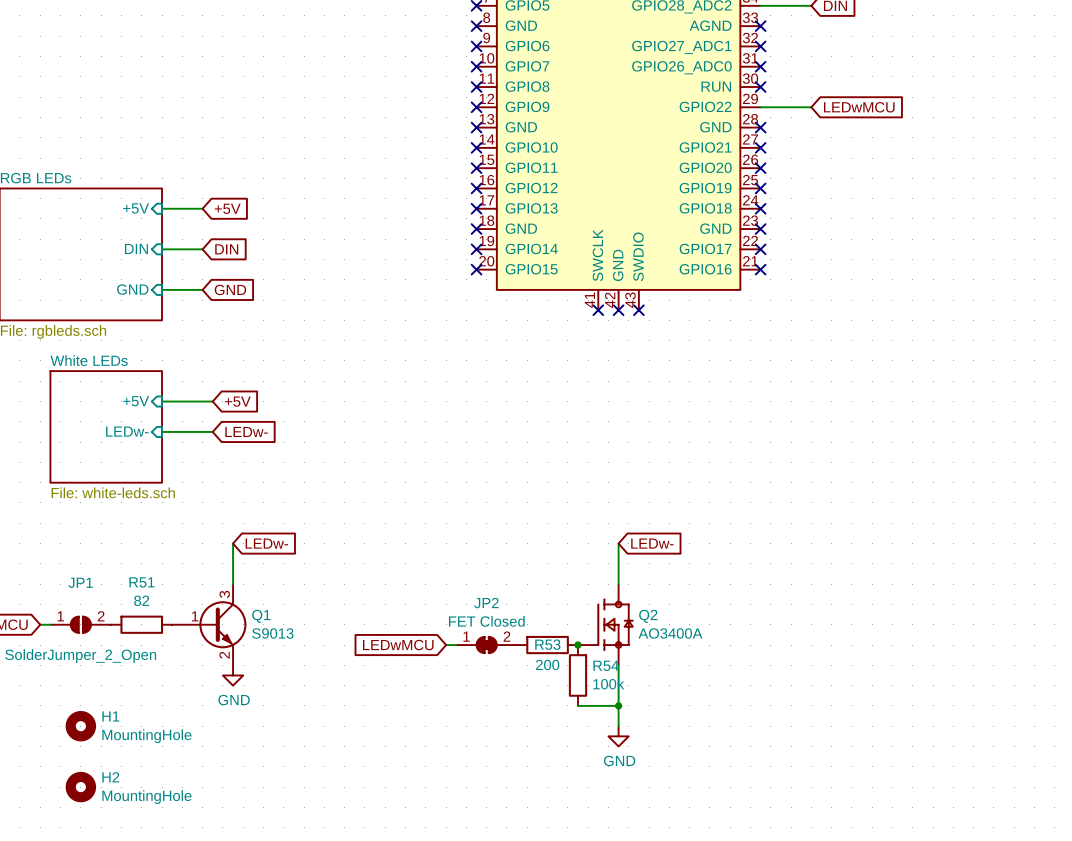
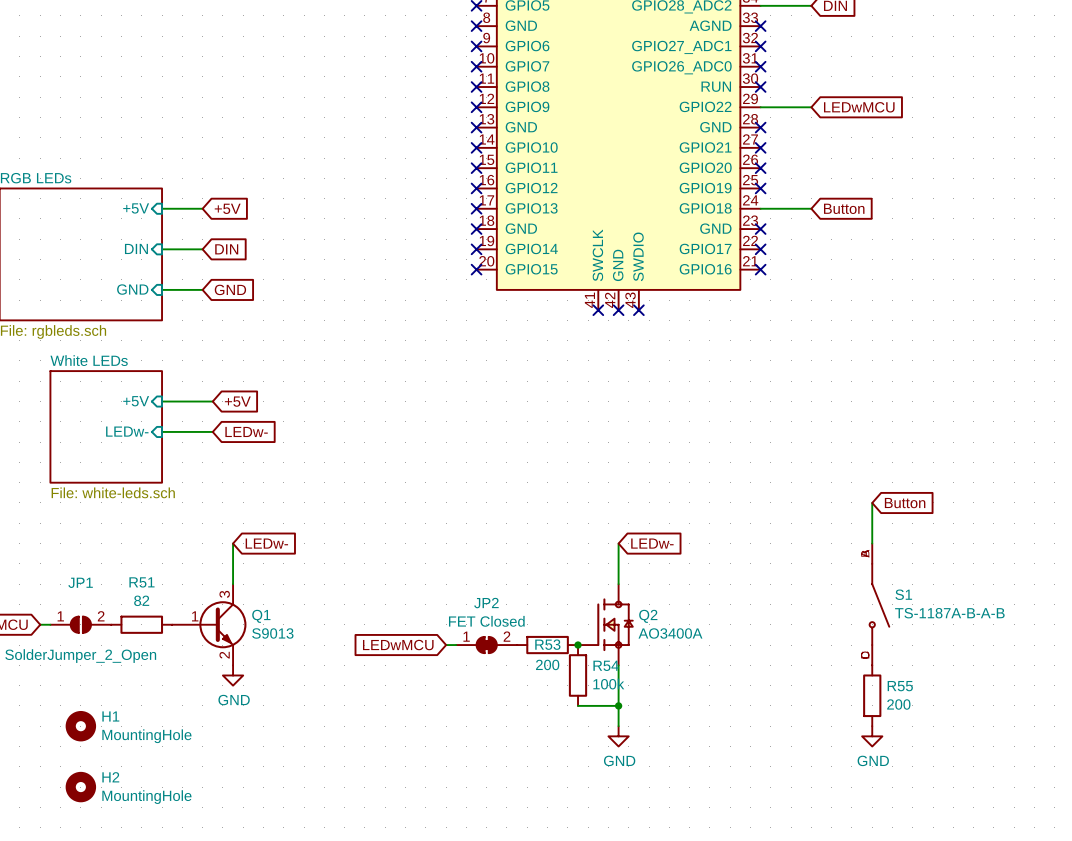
wire: none -> (760, 208) (811, 208)
no-connect mark: (760, 208) -> none
global label: none -> Button (844, 208)
wire: none -> (872, 502) (872, 543)
global label: none -> Button (905, 503)
S1: none -> TS-1187A-B-A-B (879, 604)
R55: none -> 200 (872, 695)
power symbol: none -> GND (872, 736)

